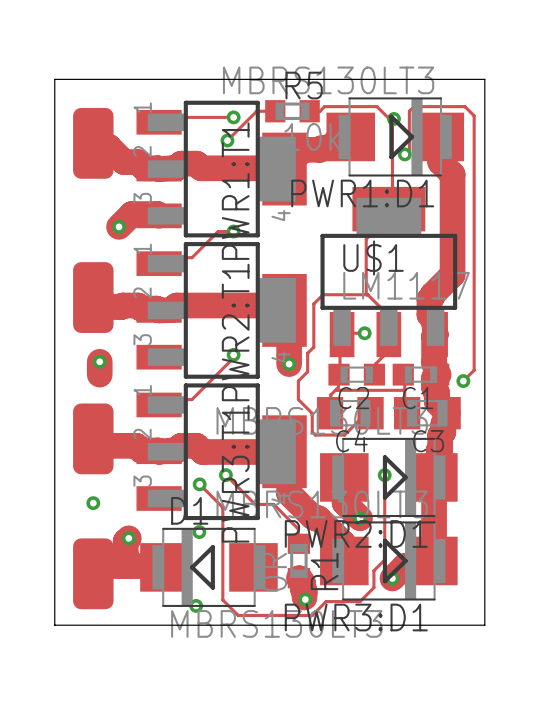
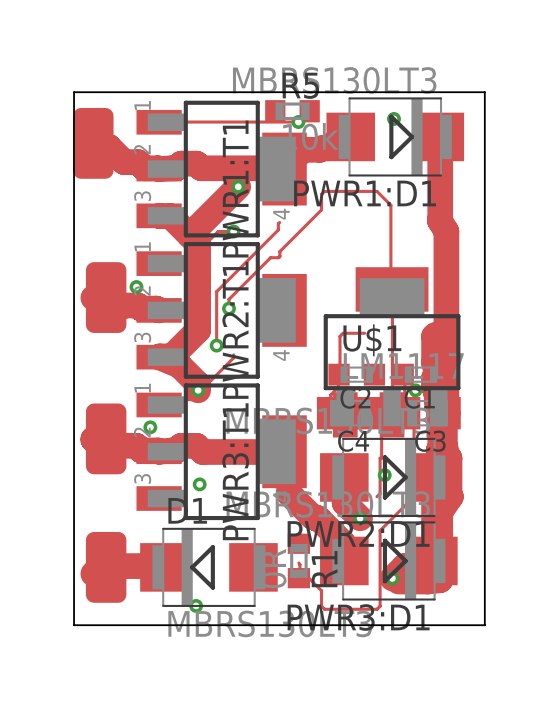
board edge: (484, 92) (484, 79) (54, 79) (54, 625) (74, 625) -> (484, 92) (74, 92) (74, 625)
track: (275, 111) (256, 111) (227, 140) -> none
track: (309, 111) (319, 111) (324, 106) (377, 106) (392, 122) (392, 205) (387, 209) (387, 217) (366, 239) (366, 294) -> none
track: (233, 117) (164, 117) (159, 122) -> (298, 122) (159, 122)
via: (233, 117) -> none
via: none -> (298, 122)
via: (227, 140) -> none
track: (404, 154) (409, 149) (409, 111) (414, 106) (464, 106) (474, 115) (474, 370) (463, 381) -> none
via: (404, 154) -> none
track: (440, 162) (452, 174) (452, 274) (429, 299) (429, 314) (434, 319) (435, 334) -> (440, 162) (439, 220) (446, 231) (446, 404) (438, 414) (444, 419) (444, 445) (449, 458) (450, 496) (440, 510) (440, 579) (398, 581)
track: none -> (238, 186) (189, 235)
via: none -> (238, 186)
track: (159, 215) (157, 214) (131, 214) (119, 226) -> (159, 215) (170, 216) (198, 243) (198, 330) (171, 356) (159, 357) (179, 365) (198, 384) (198, 390)
track: none -> (279, 222) (278, 229) (216, 291) (216, 345)
via: (119, 226) -> none
U$1 position: (388, 272) -> (392, 352)
via: none -> (136, 287)
part position: (93, 297) -> (106, 297)
track: none -> (229, 308) (229, 299) (270, 257) (279, 256) (279, 251) (321, 209) (321, 194) (324, 191) (377, 191) (390, 205) (392, 413) (381, 424) (380, 493) (377, 496)
via: none -> (229, 308)
track: (159, 310) (171, 310) (176, 305) (270, 305) (284, 310) (289, 314) (289, 364) -> none
via: (364, 333) -> none
via position: (233, 354) -> (216, 345)
track: (99, 361) (99, 374) -> none
via: (99, 361) -> none
via: (289, 364) -> none
track: (374, 374) (375, 364) (387, 351) (388, 334) (381, 327) (381, 308) (367, 294) (323, 294) (313, 303) (313, 347) (307, 353) (307, 371) (298, 381) (298, 399) (312, 413) (312, 431) (315, 435) (344, 435) (366, 413) (370, 413) -> none
via: (463, 381) -> none
track: (336, 389) (404, 390) -> none
via: none -> (198, 390)
track: none -> (415, 390) (412, 495) (409, 496) (409, 501) (380, 530) (380, 606) (377, 609) (324, 609) (321, 606) (321, 590) (299, 569) (298, 563)
via: none -> (415, 390)
via: none -> (150, 427)
part position: (93, 438) -> (106, 438)
track: (225, 475) (255, 504) (273, 504) (298, 529) (298, 543) -> none
via: (225, 475) -> none
track: (384, 475) (384, 559) (373, 570) (373, 587) (360, 601) (326, 601) (312, 615) (238, 615) (222, 600) (222, 507) (199, 484) -> none
via: (93, 503) -> none
via: (199, 532) -> none
track: (128, 538) (125, 541) (125, 566) -> none
via: (128, 538) -> none
part position: (93, 573) -> (106, 567)
track: (298, 578) (303, 583) (304, 597) -> none
via: (305, 599) -> none

